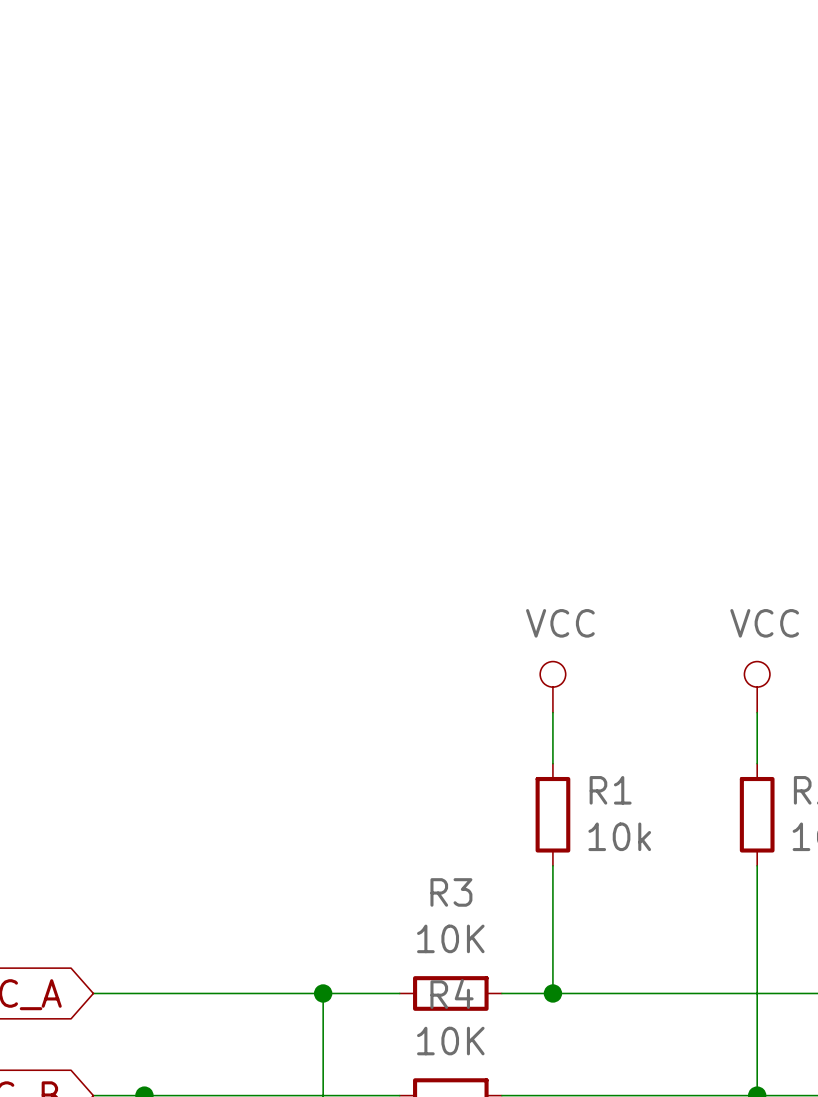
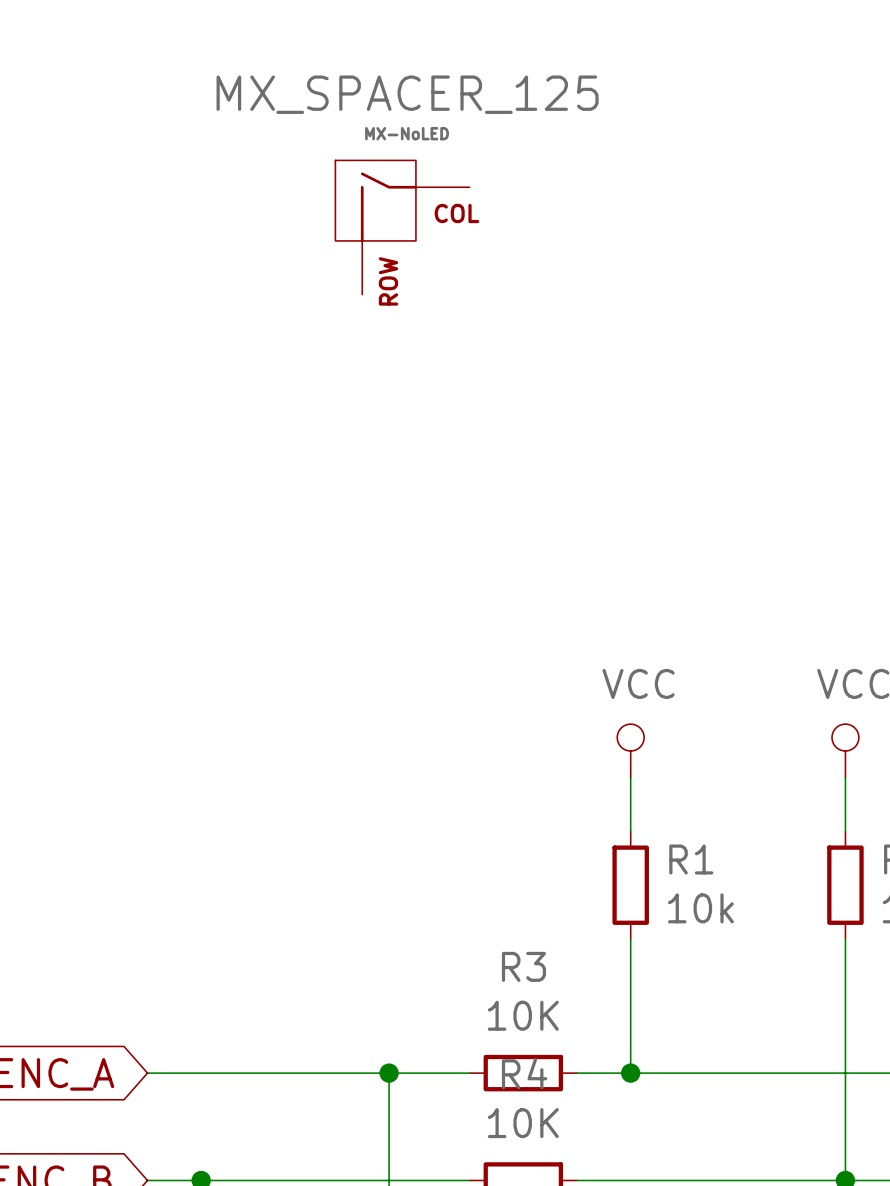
MX_SPACER_125: none -> MX-NoLED (402, 227)

